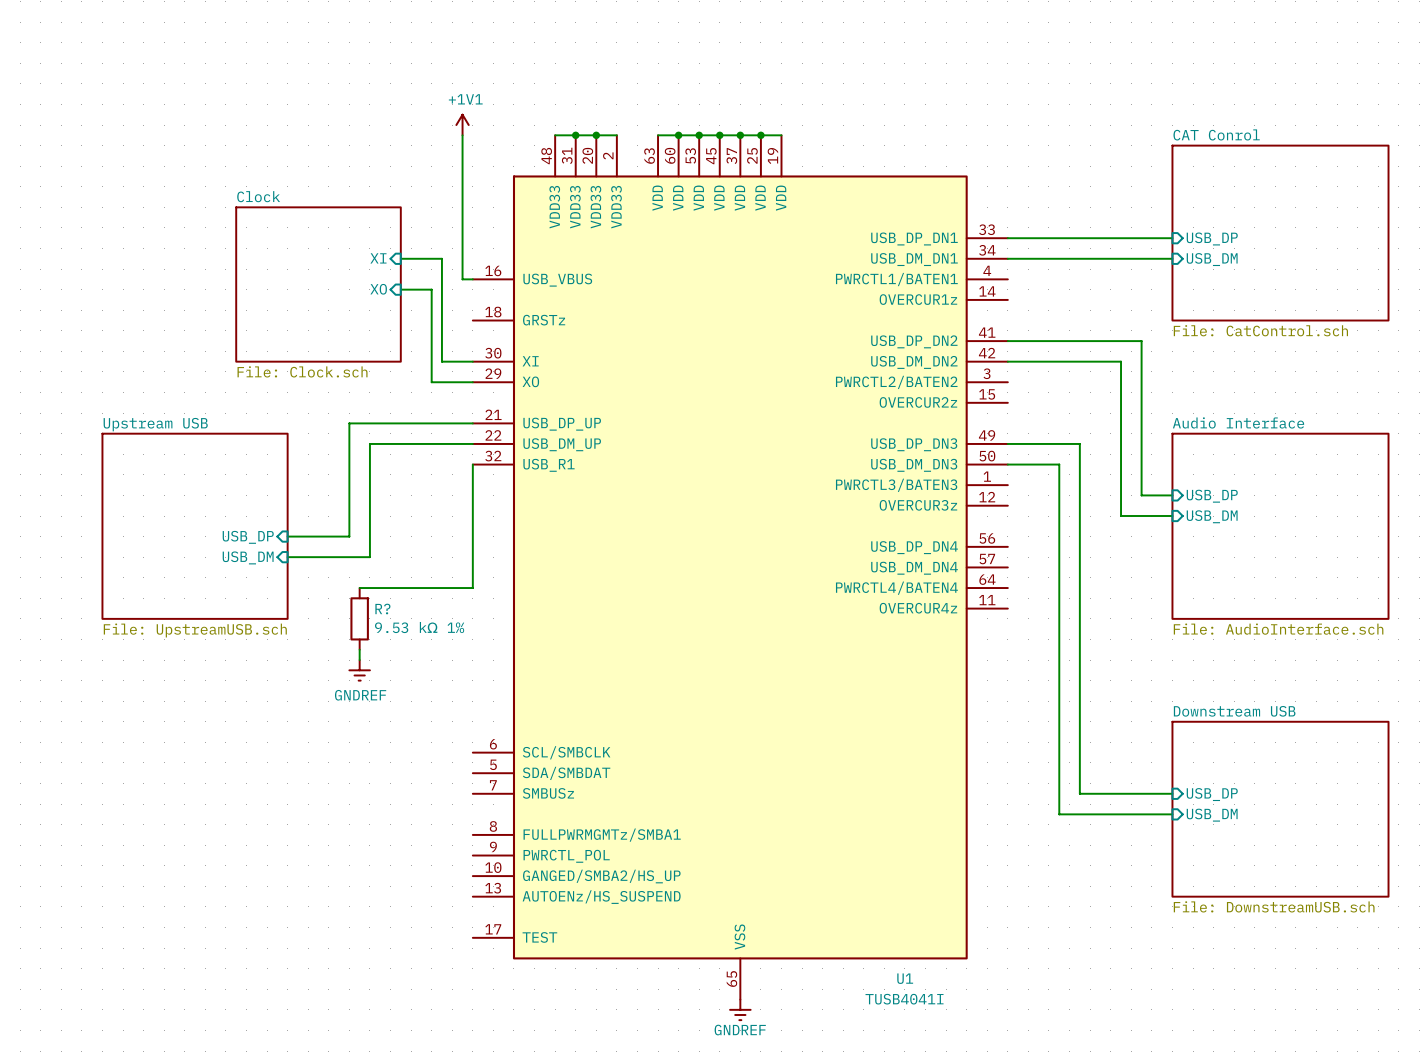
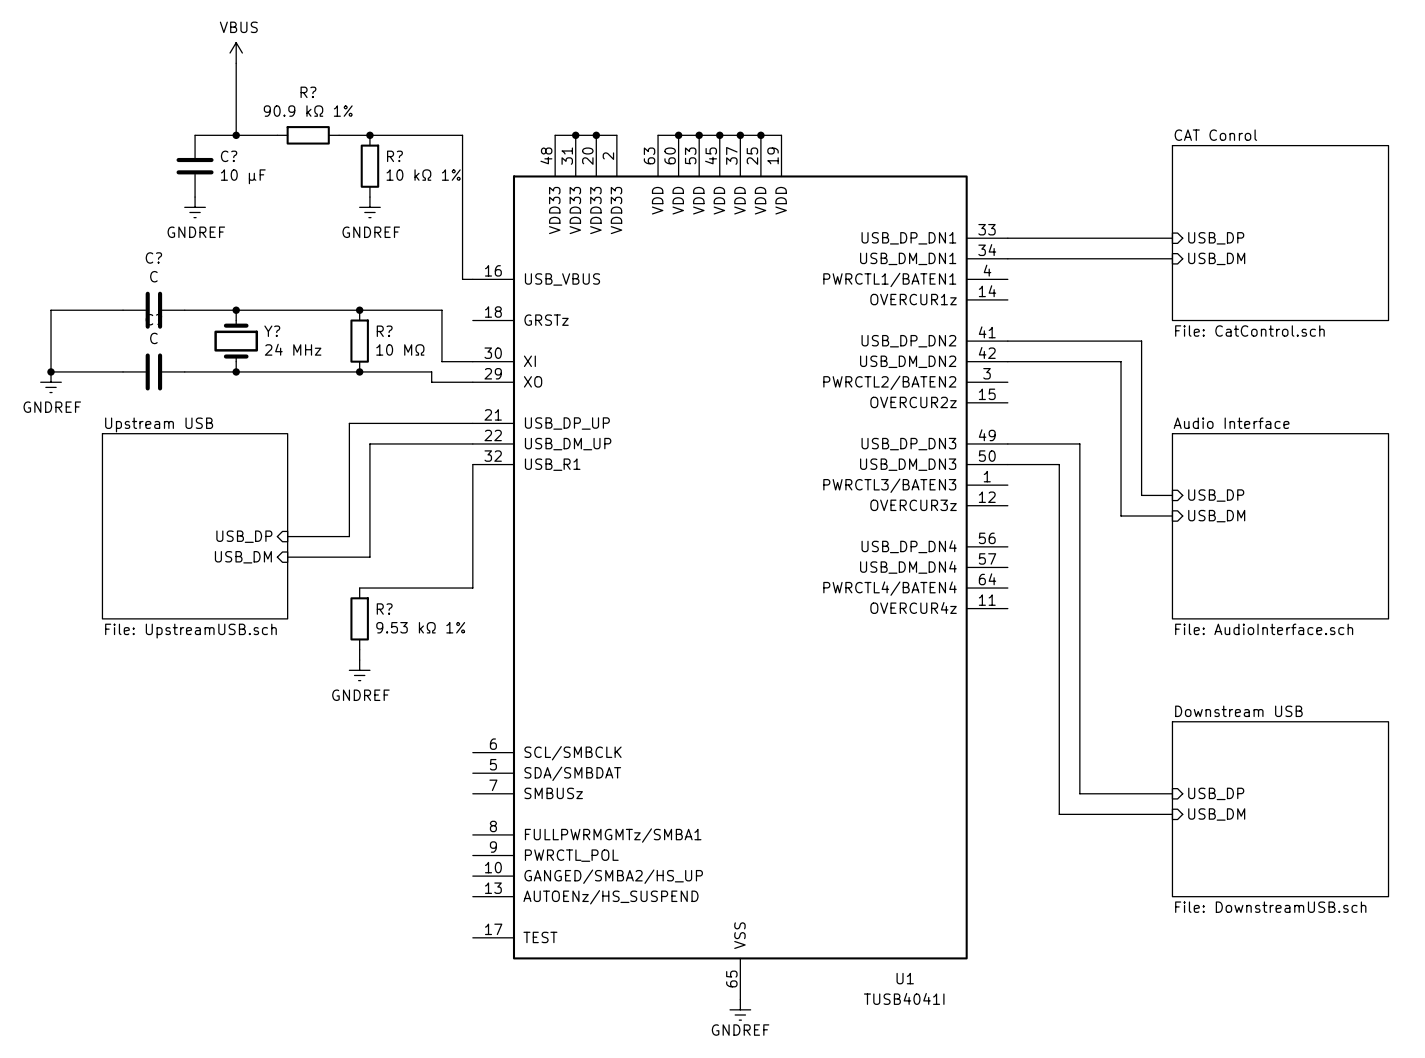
power symbol: none -> VBUS (236, 53)
wire: none -> (236, 63) (236, 135)
power symbol: +1V1 (462, 125) -> none
wire: none -> (195, 135) (277, 135)
junction: none -> (236, 135)
R?: none -> 90.9 kΩ 1% (308, 135)
wire: none -> (339, 135) (462, 135)
junction: none -> (369, 135)
C?: none -> 10 μF (195, 166)
R?: none -> 10 kΩ 1% (369, 166)
power symbol: none -> GNDREF (195, 207)
power symbol: none -> GNDREF (369, 207)
sheet pin: XI (378, 258) -> none
wire: (400, 258) (441, 258) (441, 310) -> (184, 310) (441, 310)
sheet Clock: File: Clock.sch (318, 284) -> none
sheet pin: XO (378, 289) -> none
wire: (400, 289) (431, 289) (431, 371) -> (184, 371) (431, 371)
wire: none -> (123, 310) (51, 310) (51, 371) (123, 371)
C?: none -> C (153, 310)
junction: none -> (236, 310)
junction: none -> (359, 310)
Y?: none -> 24 MHz (236, 341)
R?: none -> 10 MΩ (359, 341)
junction: none -> (51, 371)
part: none -> C (153, 371)
junction: none -> (236, 371)
junction: none -> (359, 371)
power symbol: none -> GNDREF (51, 382)

